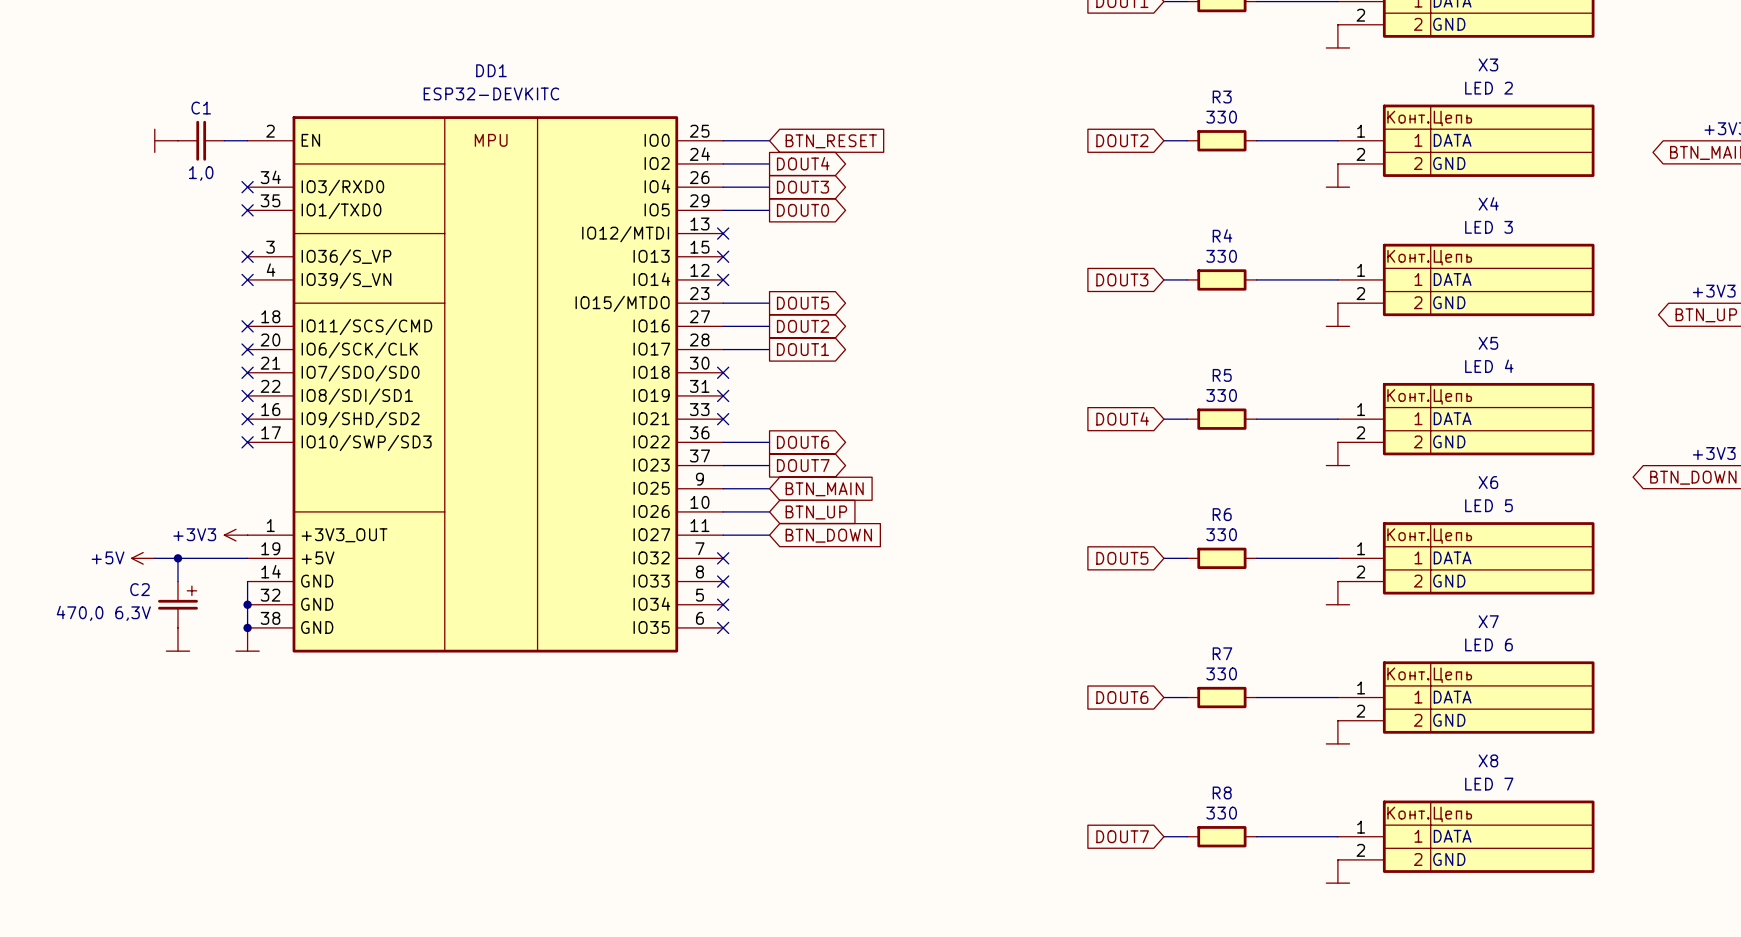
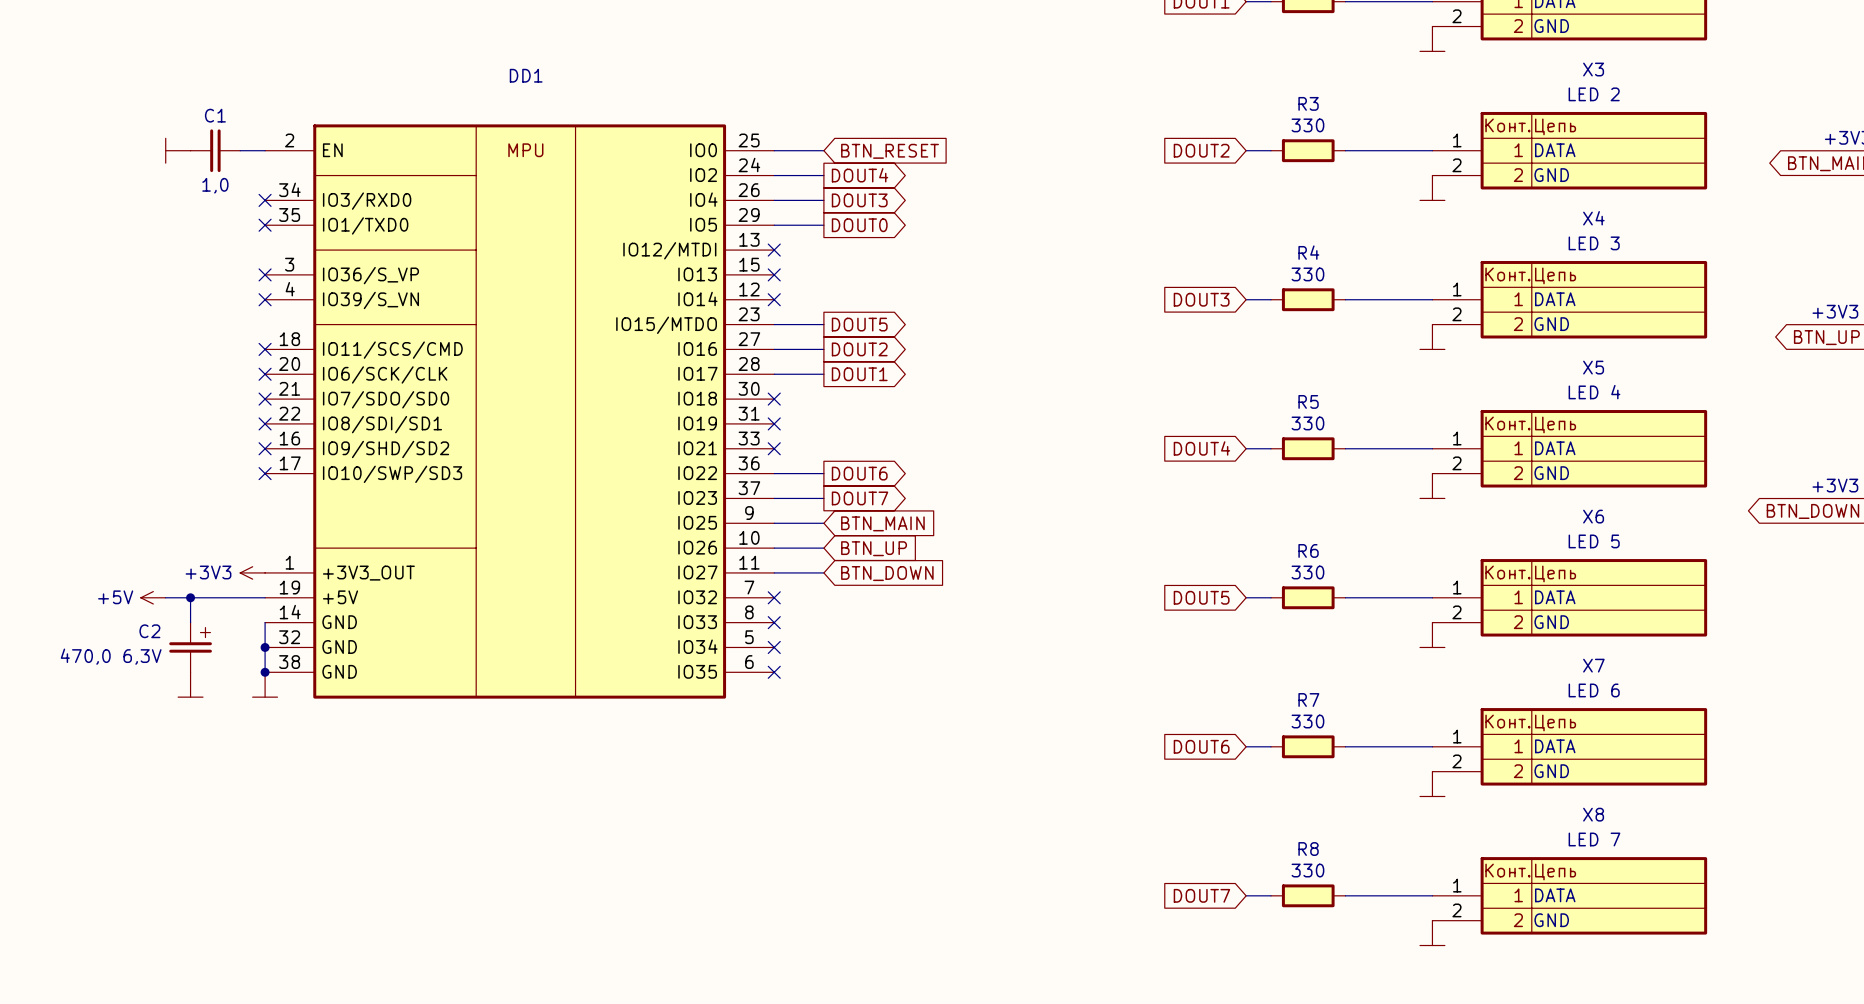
DD1 value: ESP32-DEVKITC (491, 93) -> none

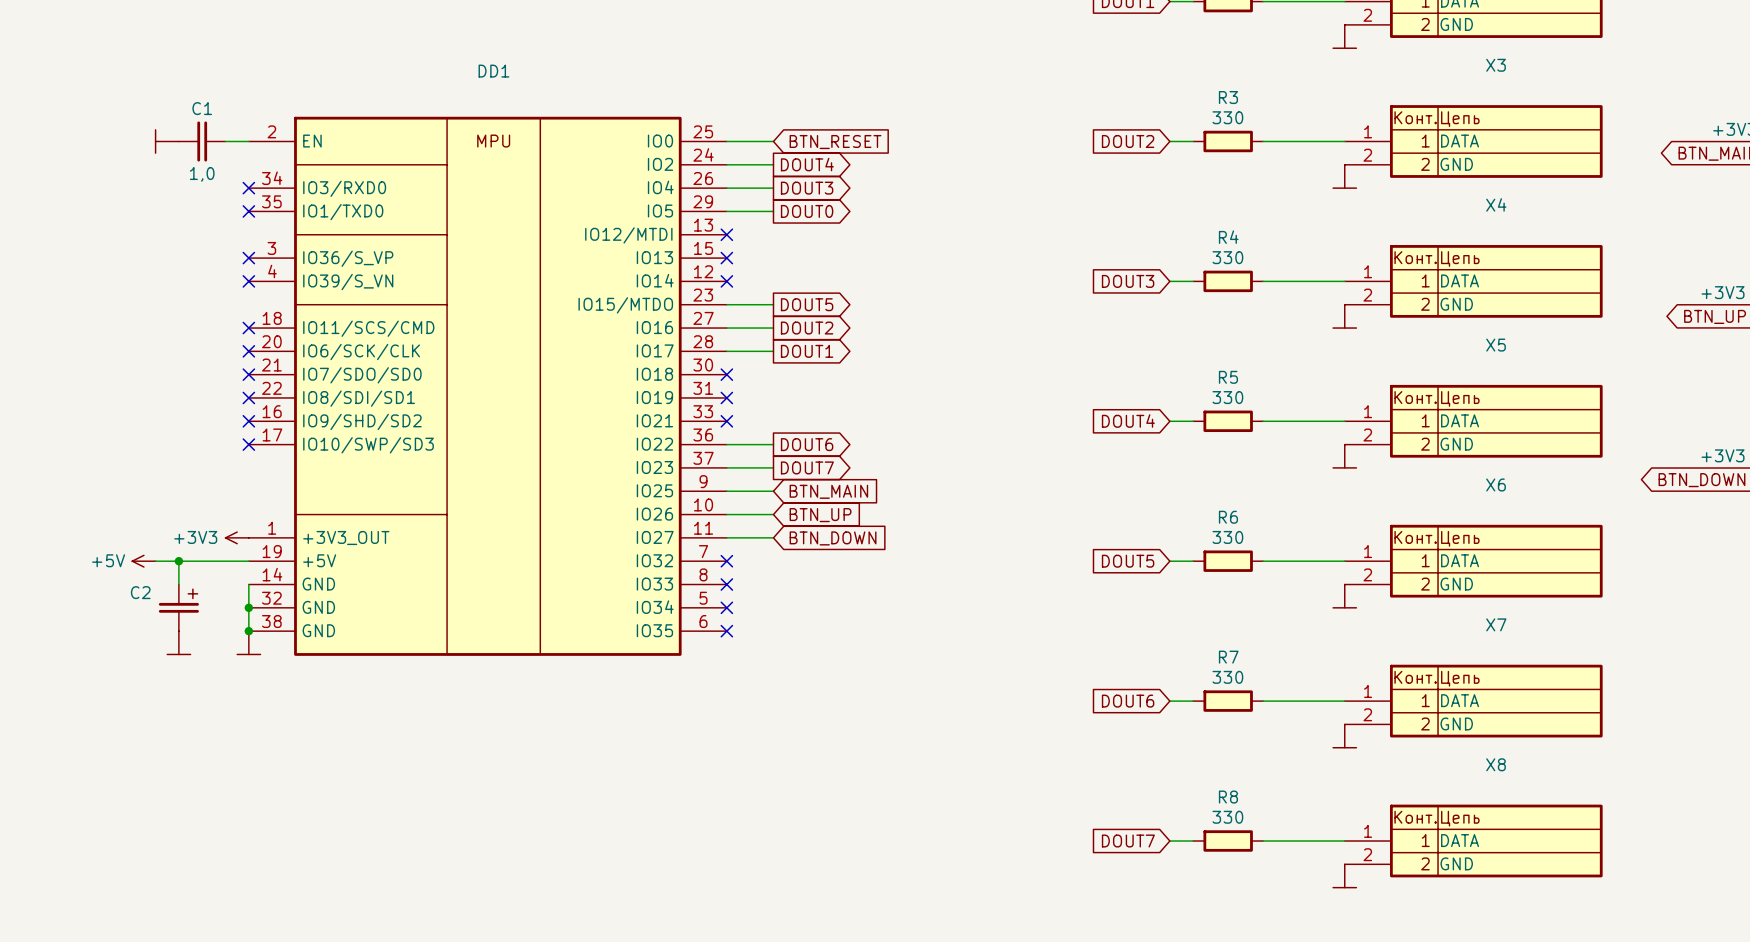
X3 value: LED 2 (1594, 94) -> none
X4 value: LED 3 (1594, 243) -> none
X5 value: LED 4 (1594, 392) -> none
X6 value: LED 5 (1594, 541) -> none
C2 value: 470,0 6,3V (111, 656) -> none
X7 value: LED 6 (1594, 690) -> none
X8 value: LED 7 (1594, 839) -> none

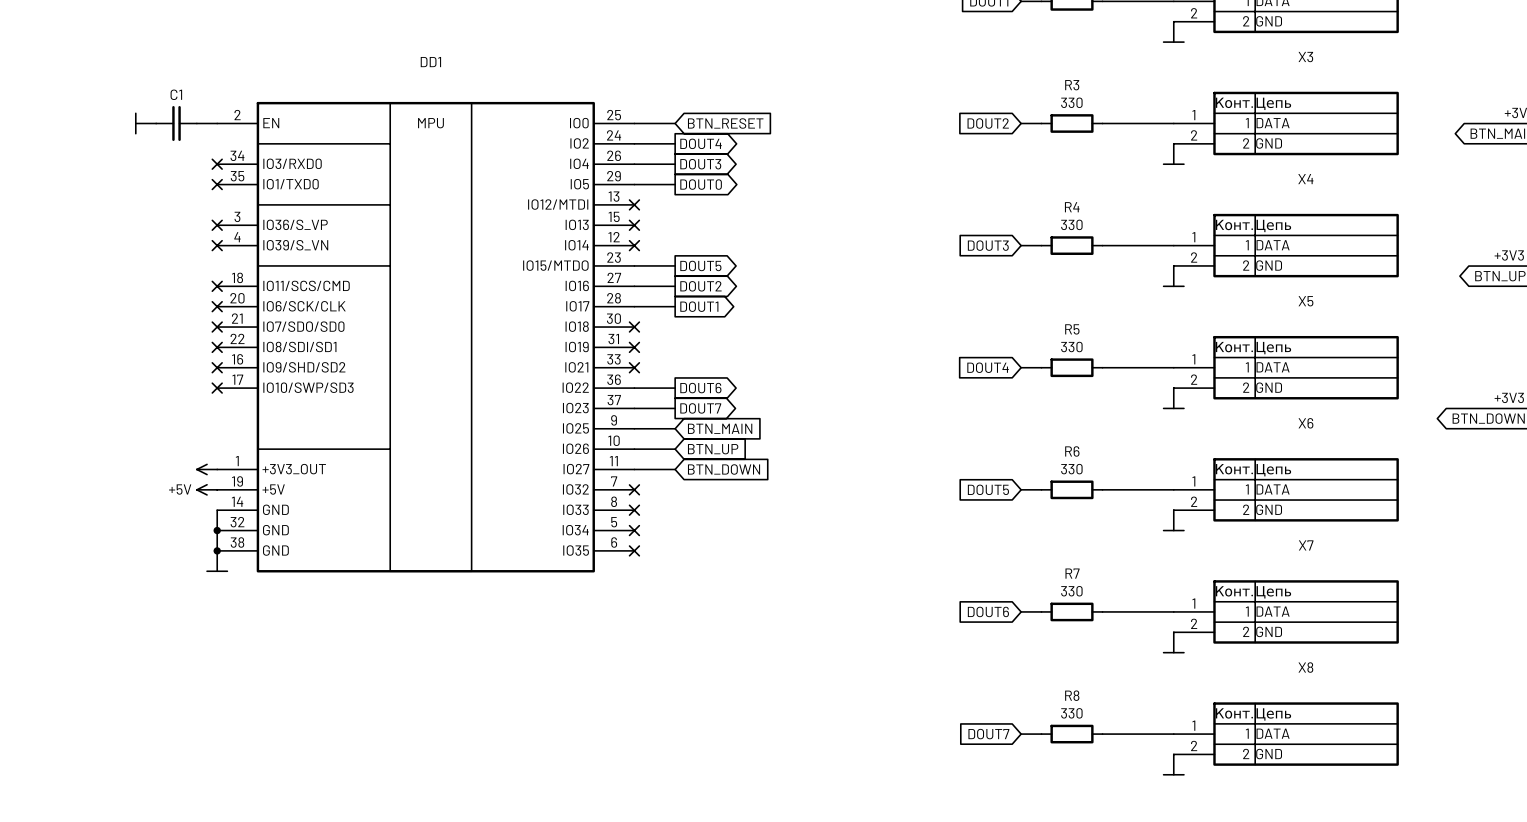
C1 value: 1,0 (202, 174) -> none
power symbol text: +3V3 (195, 537) -> none
power symbol position: +5V (143, 561) -> +5V (207, 489)
wire: (155, 561) (248, 561) -> none
wire: (178, 561) (178, 584) -> none
junction: (178, 561) -> none
C2: (178, 607) -> none
power symbol: (178, 642) -> none

